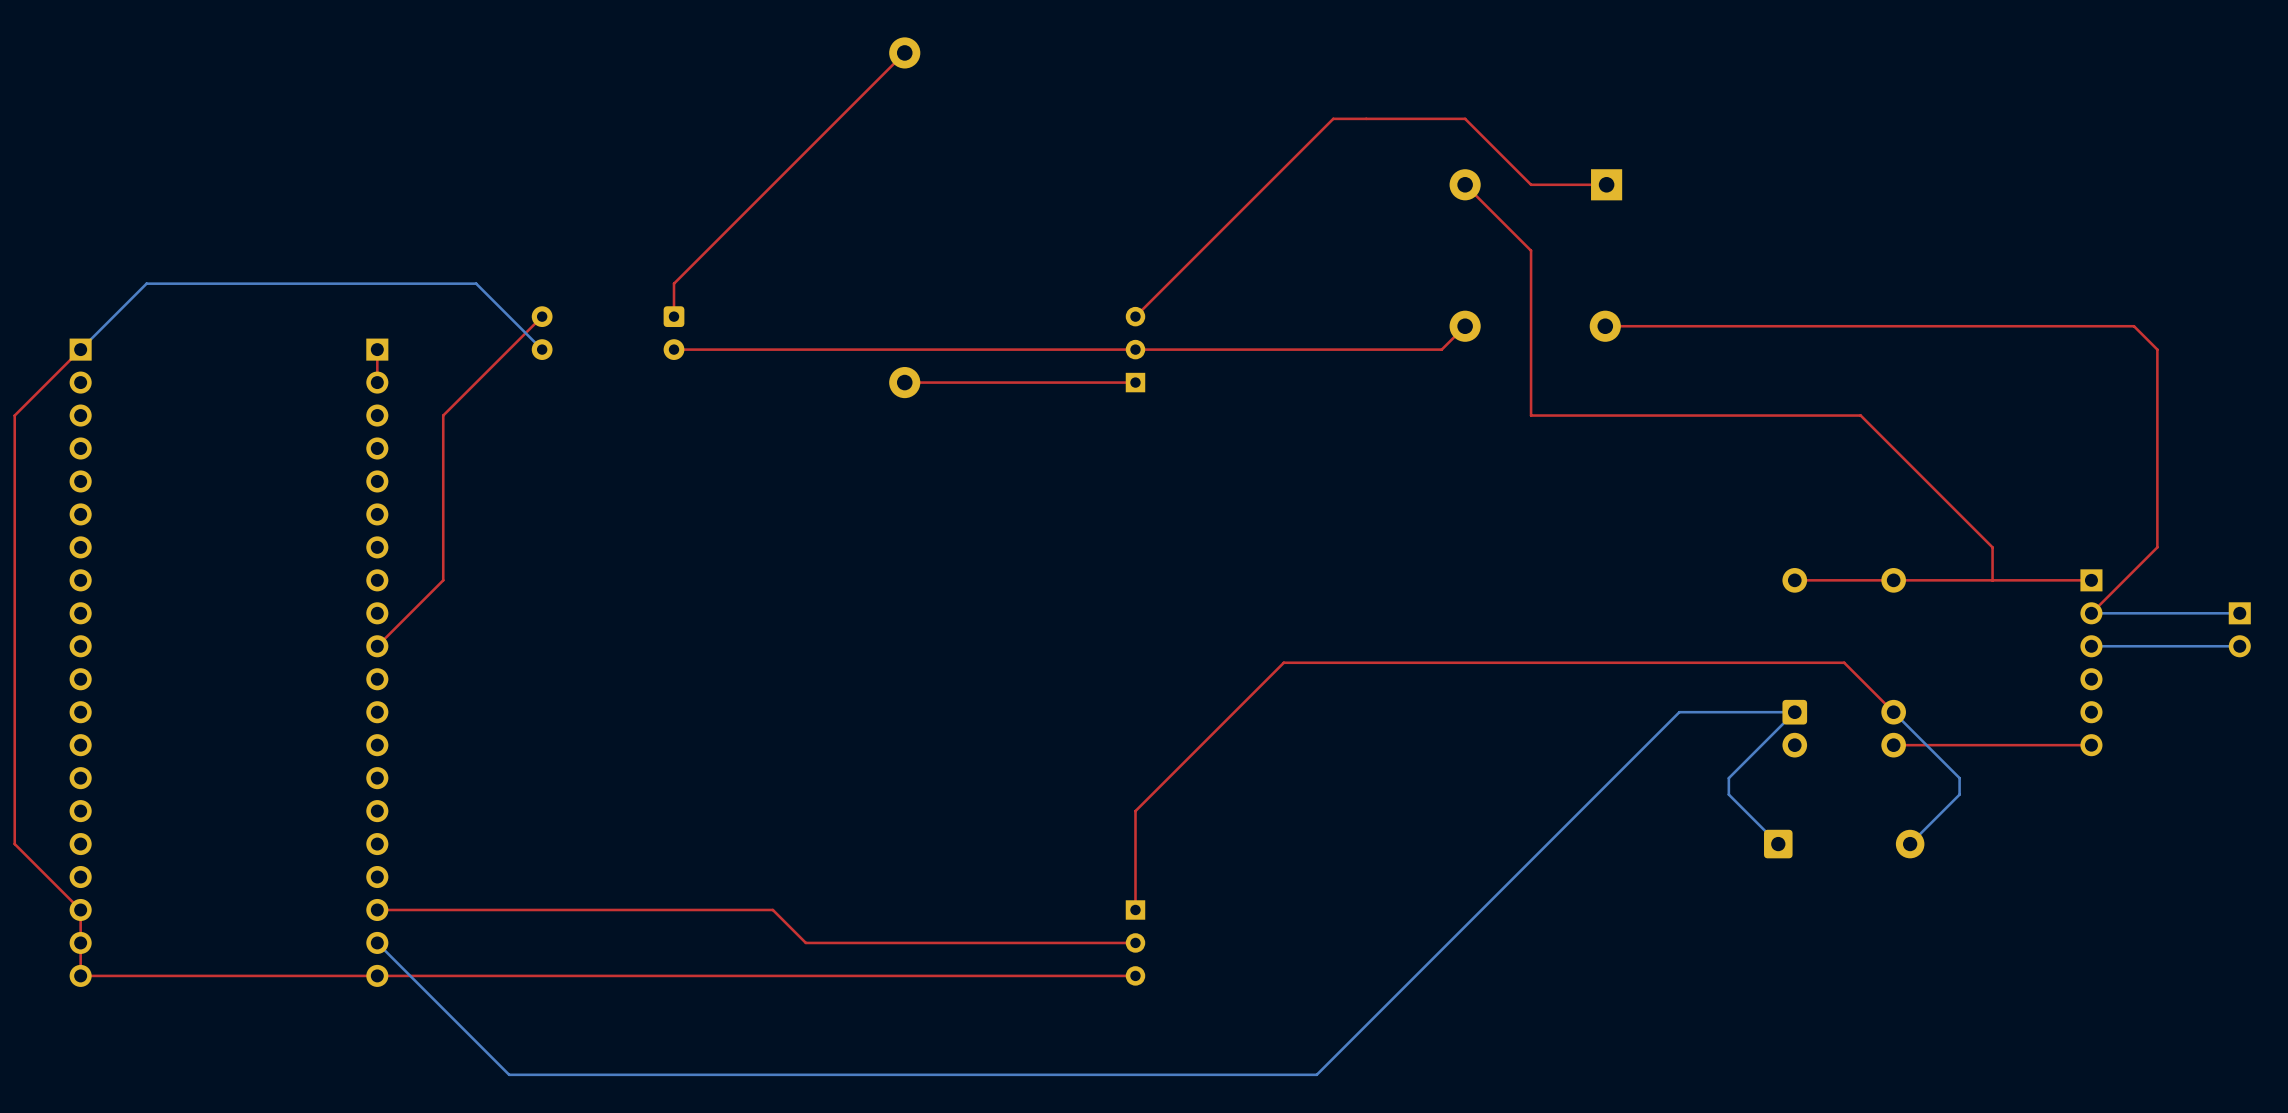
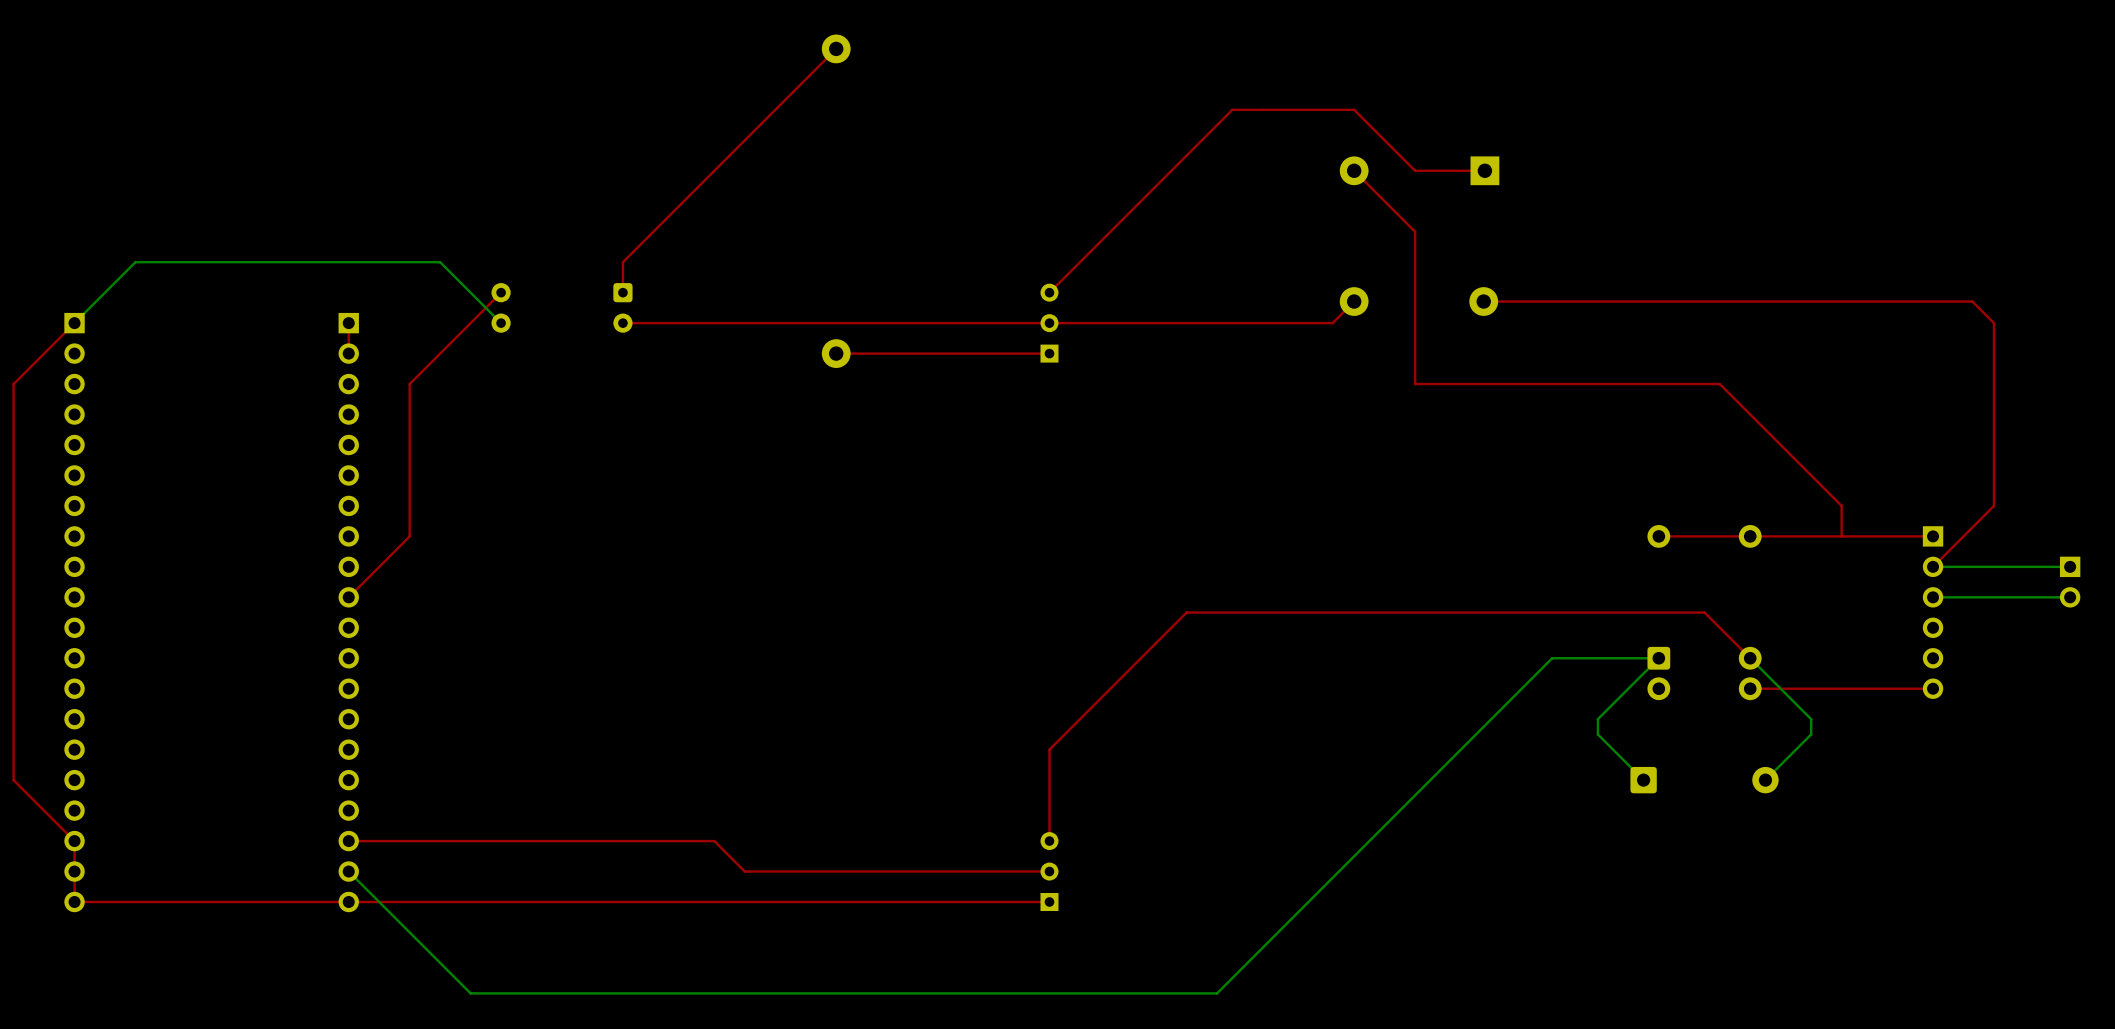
part rotation: 0° (1135, 942) -> 180° (1049, 871)

